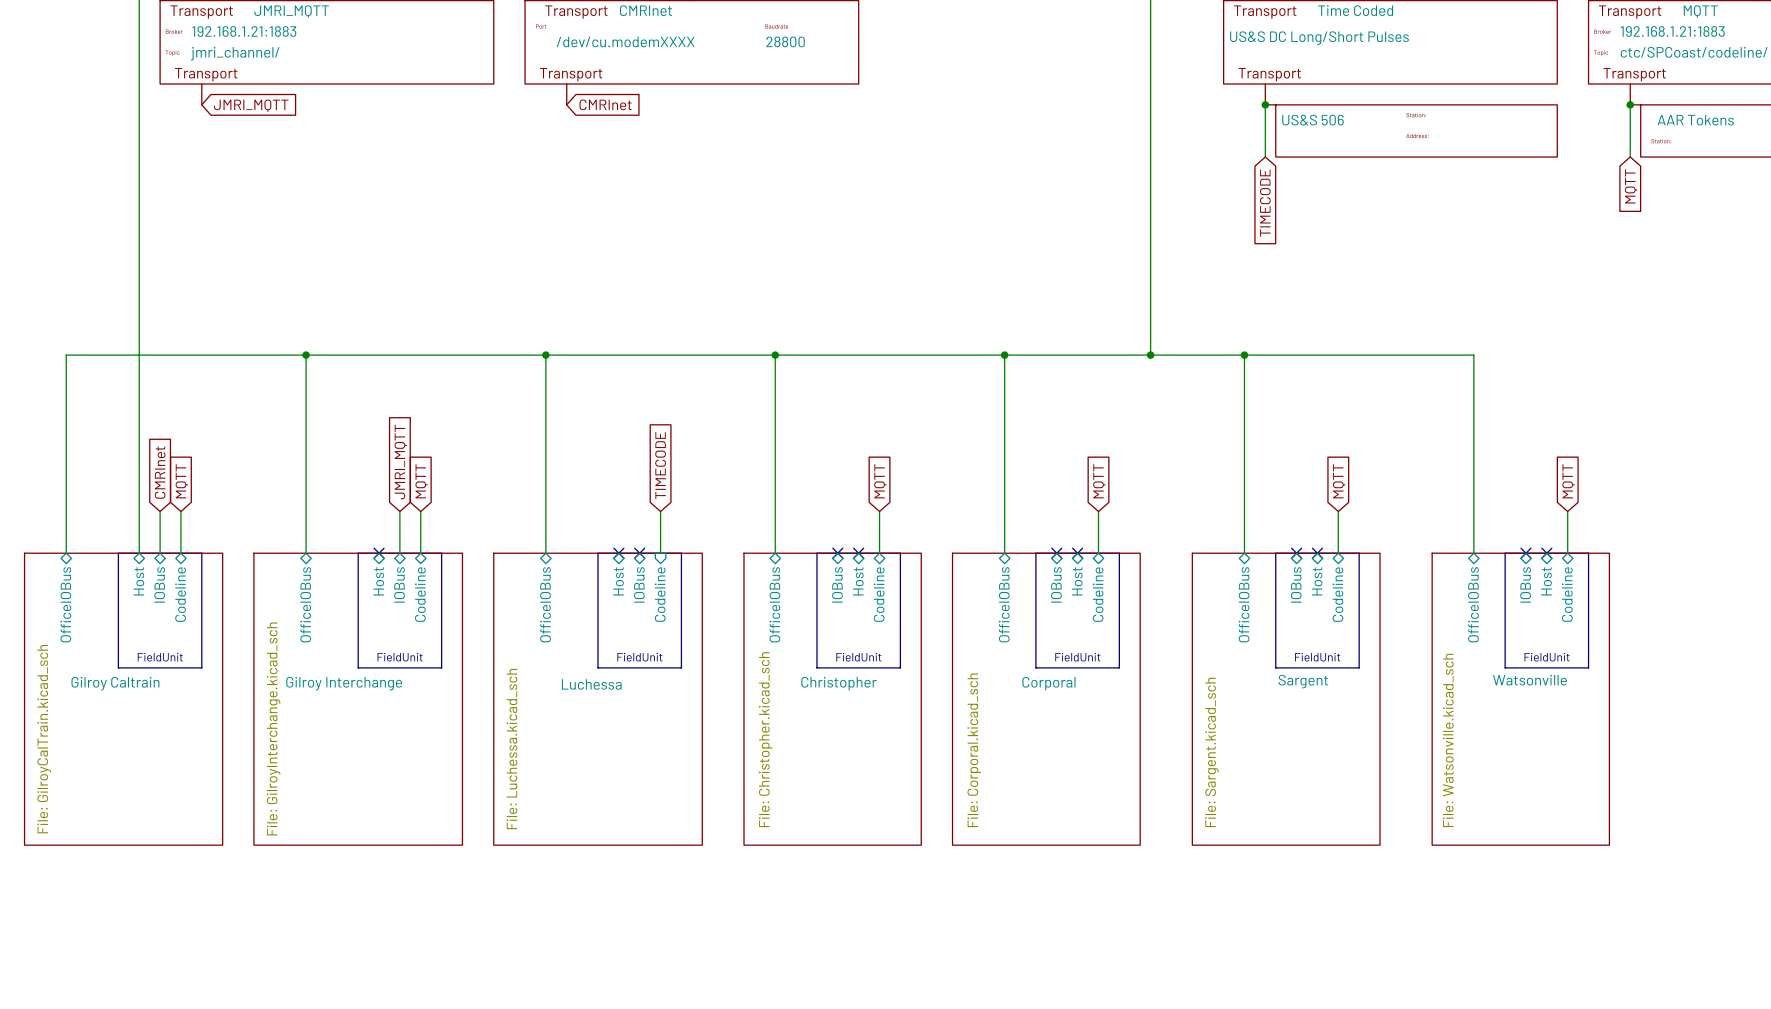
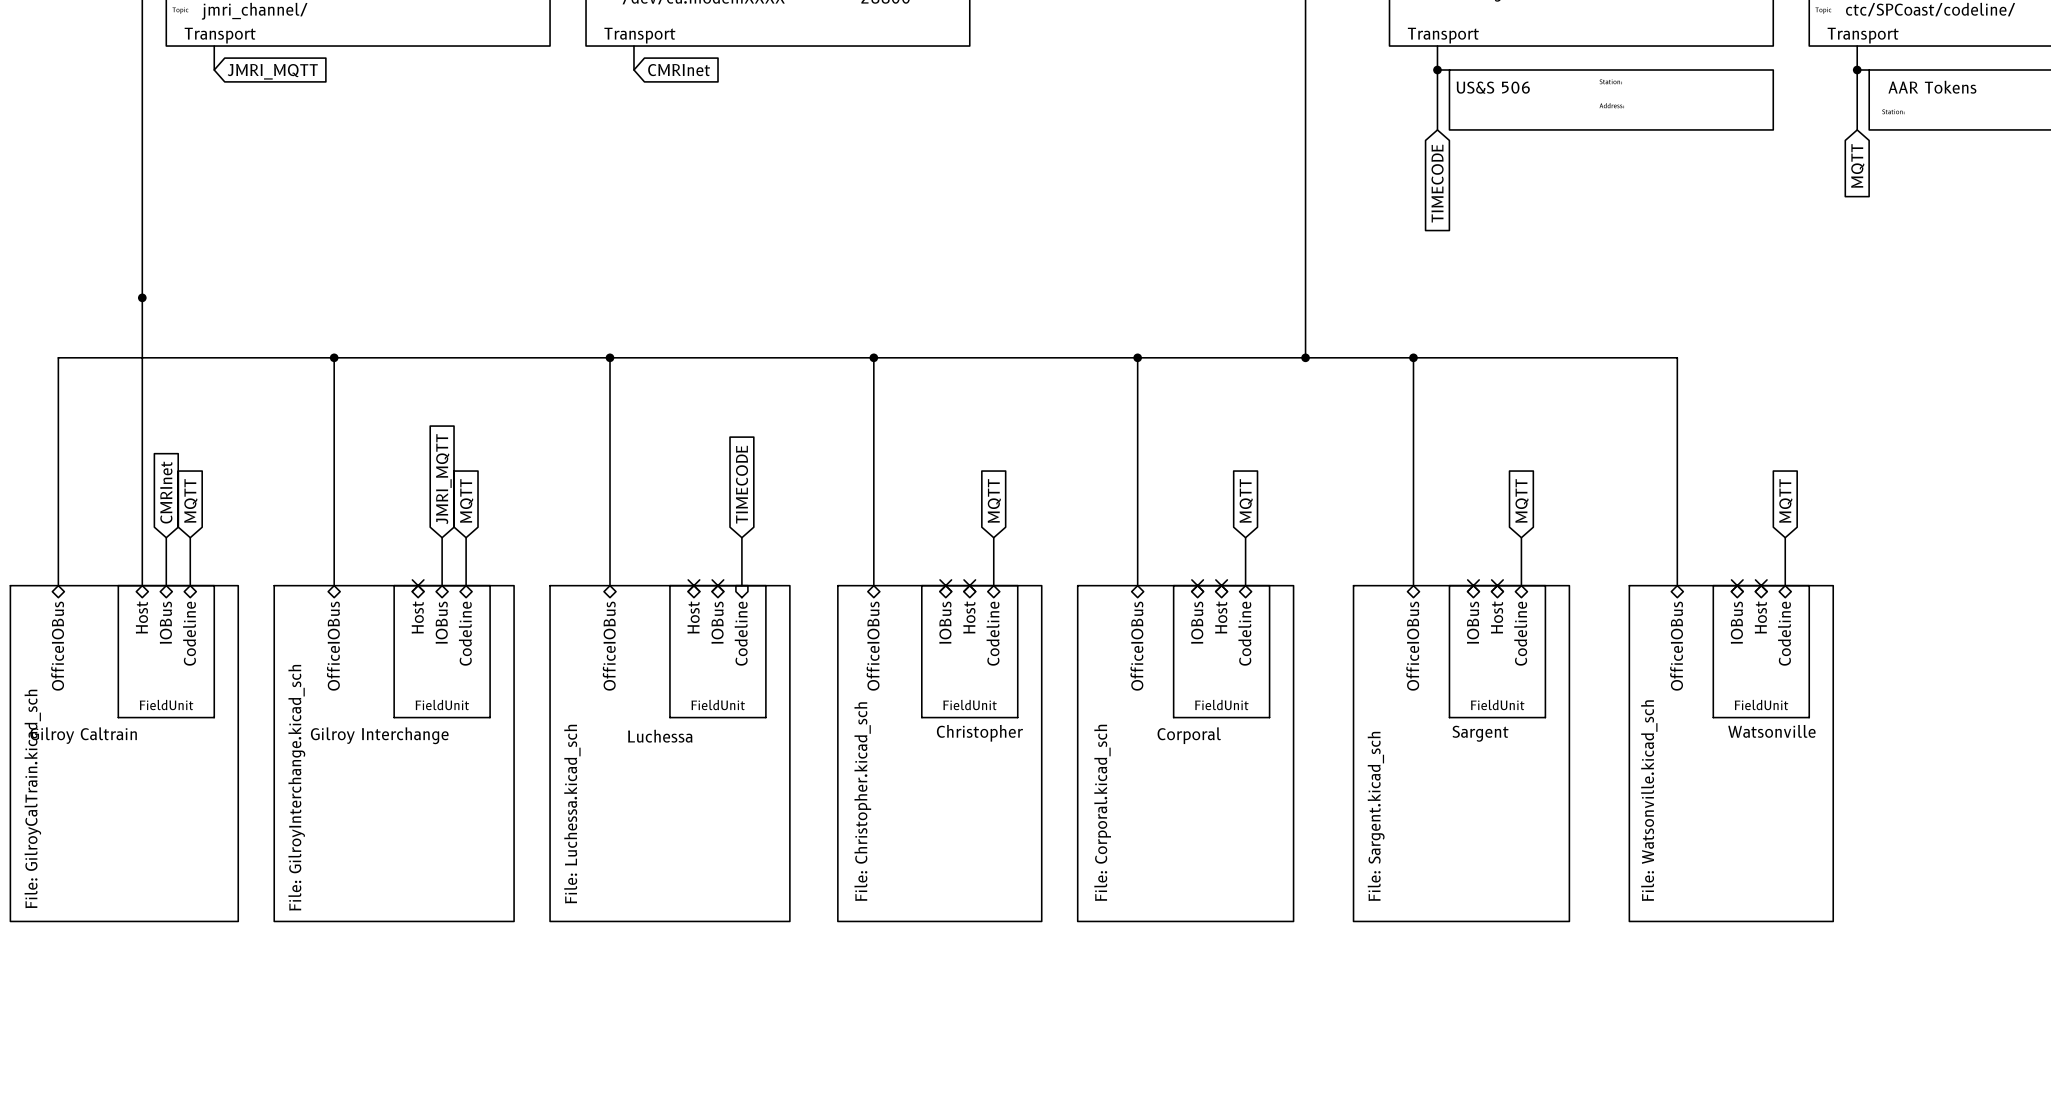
junction: none -> (142, 297)
sheet Watsonville name position: Watsonville (1529, 680) -> Watsonville (1771, 731)
sheet Gilroy Caltrain name position: Gilroy Caltrain (115, 683) -> Gilroy Caltrain (83, 735)
sheet Christopher name position: Christopher (839, 683) -> Christopher (979, 733)

